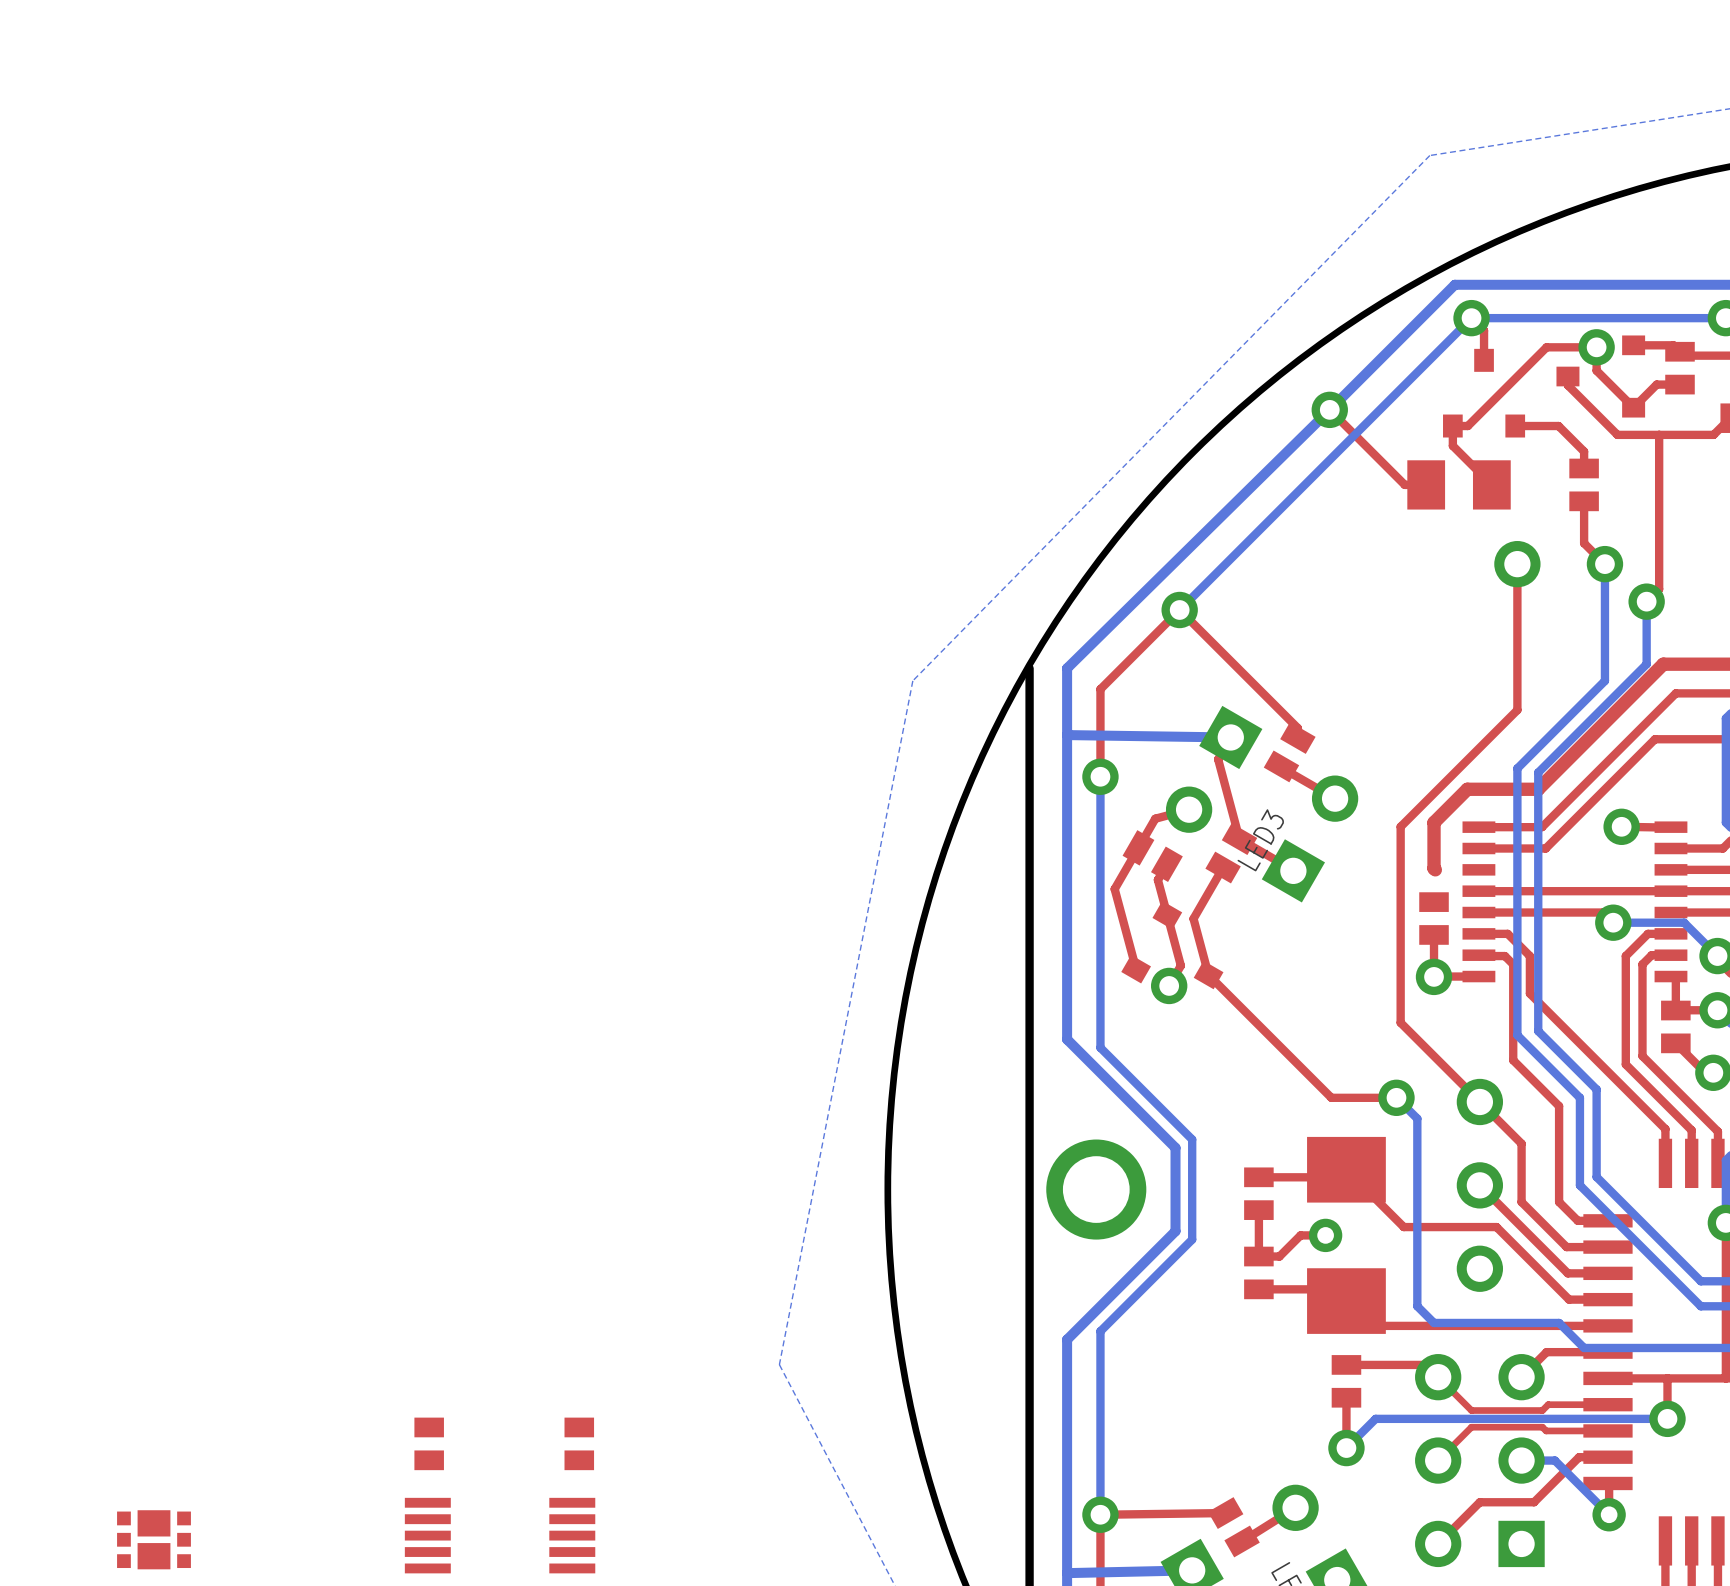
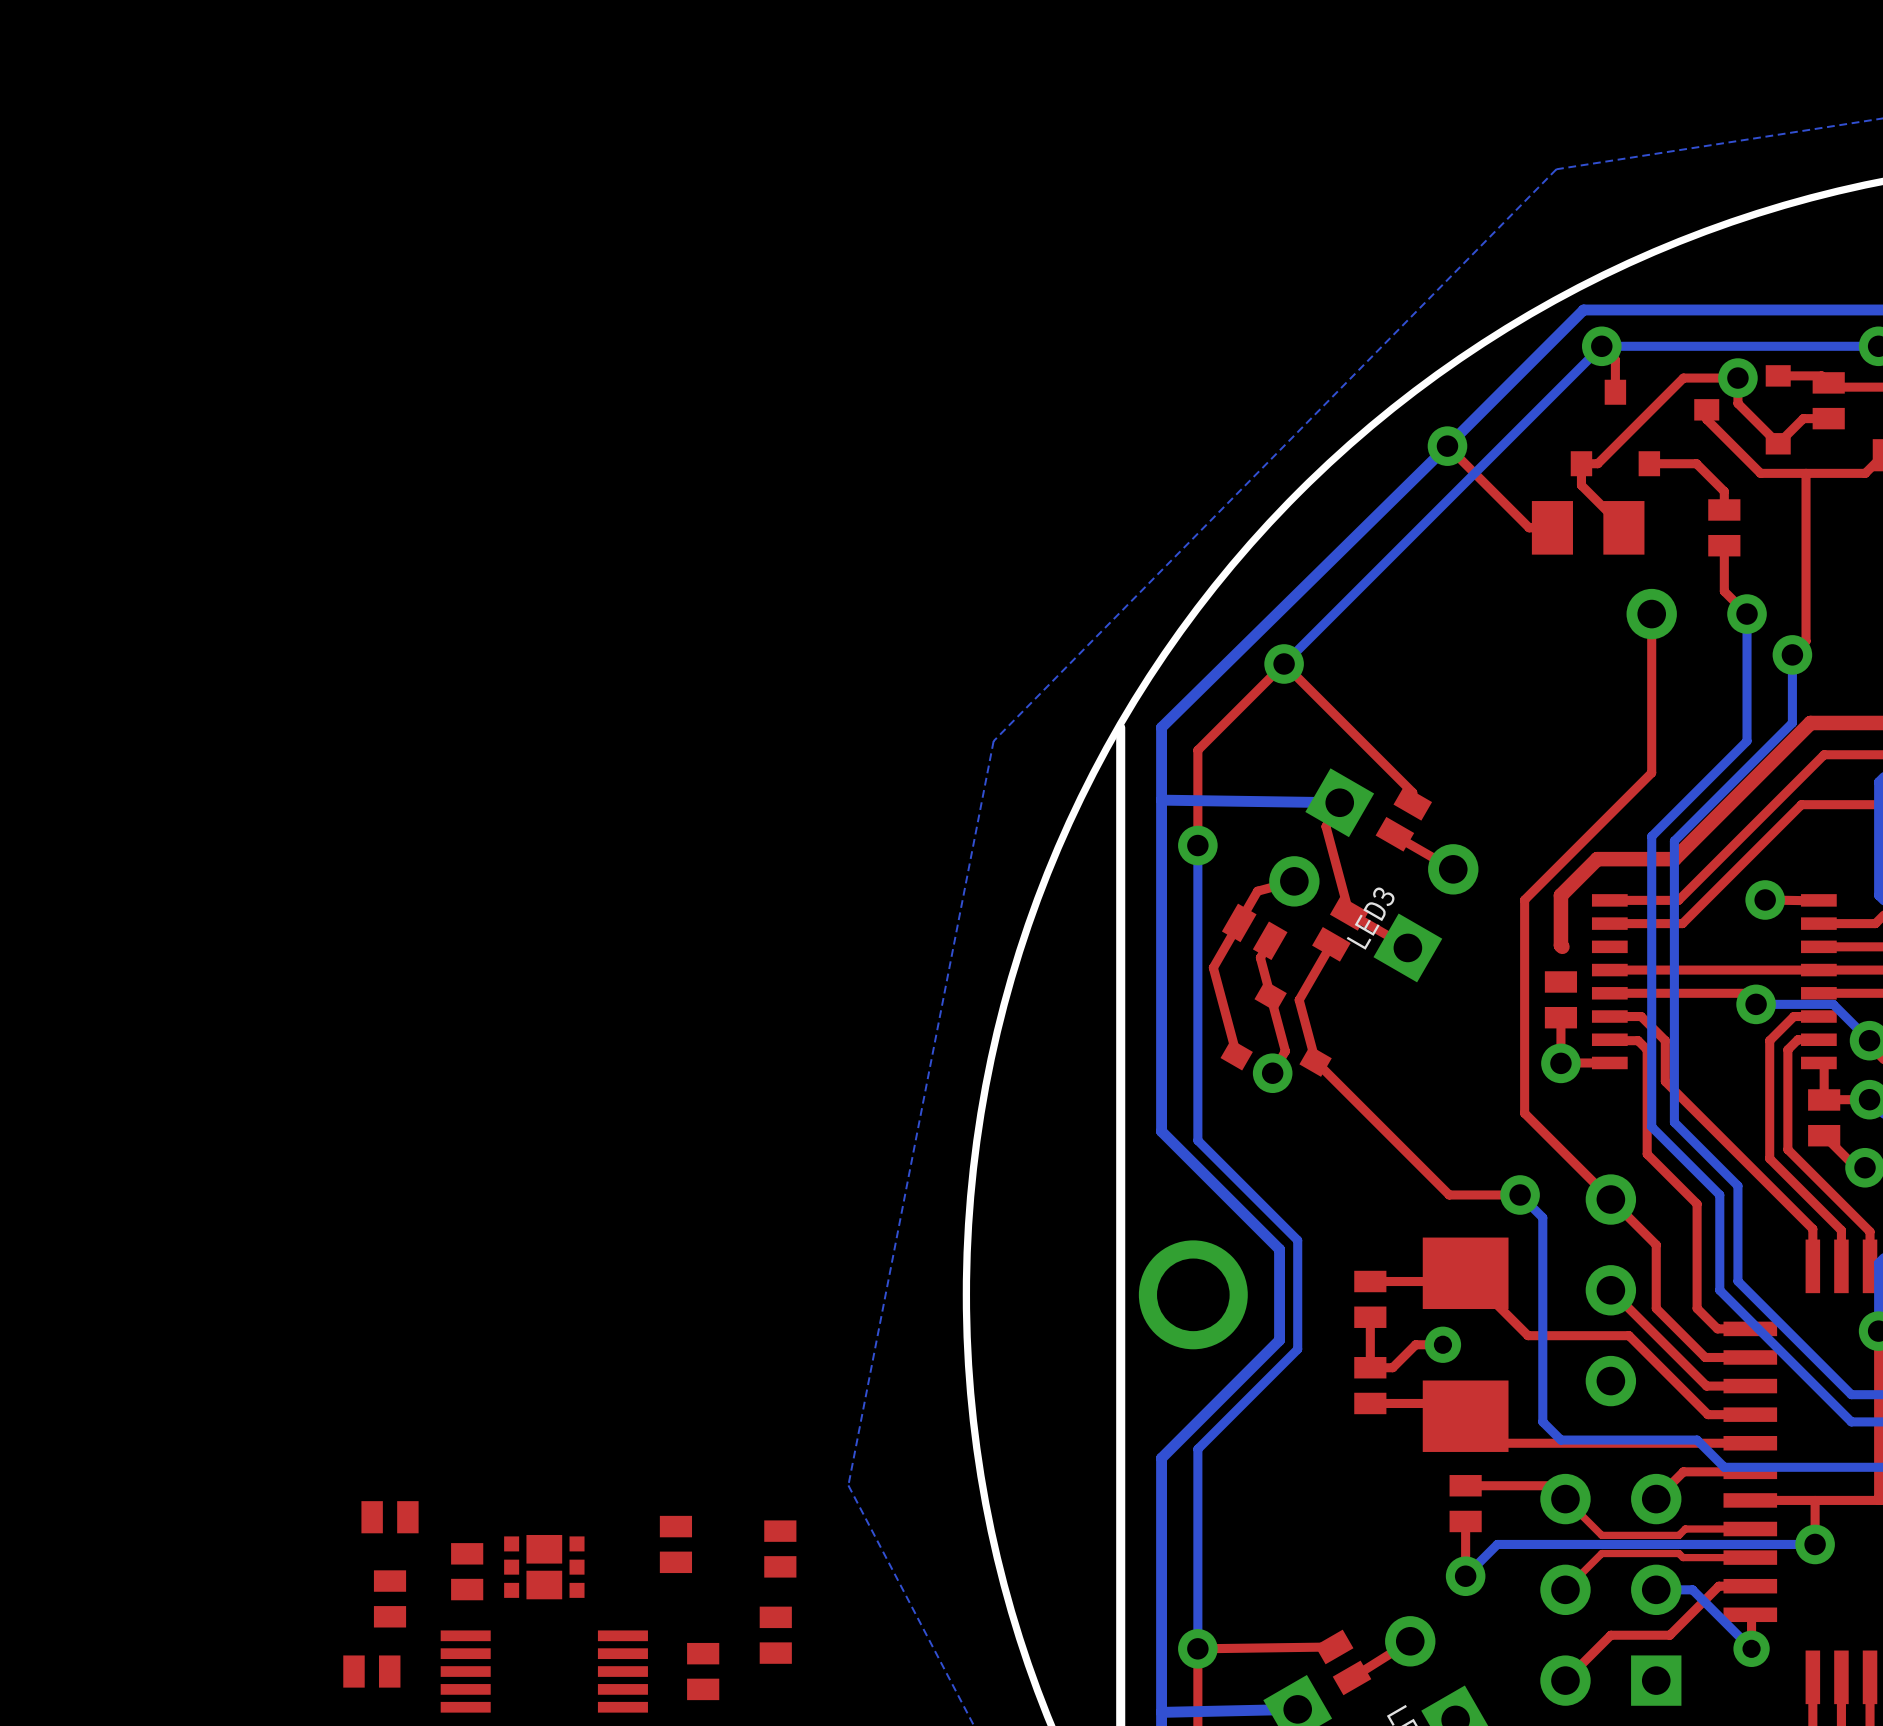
part: none -> (390, 1517)
part: none -> (780, 1548)
part position: (579, 1443) -> (675, 1544)
part: none -> (390, 1598)
part: none -> (775, 1635)
part: none -> (371, 1671)
part: none -> (703, 1671)
part position: (154, 1539) -> (544, 1567)

